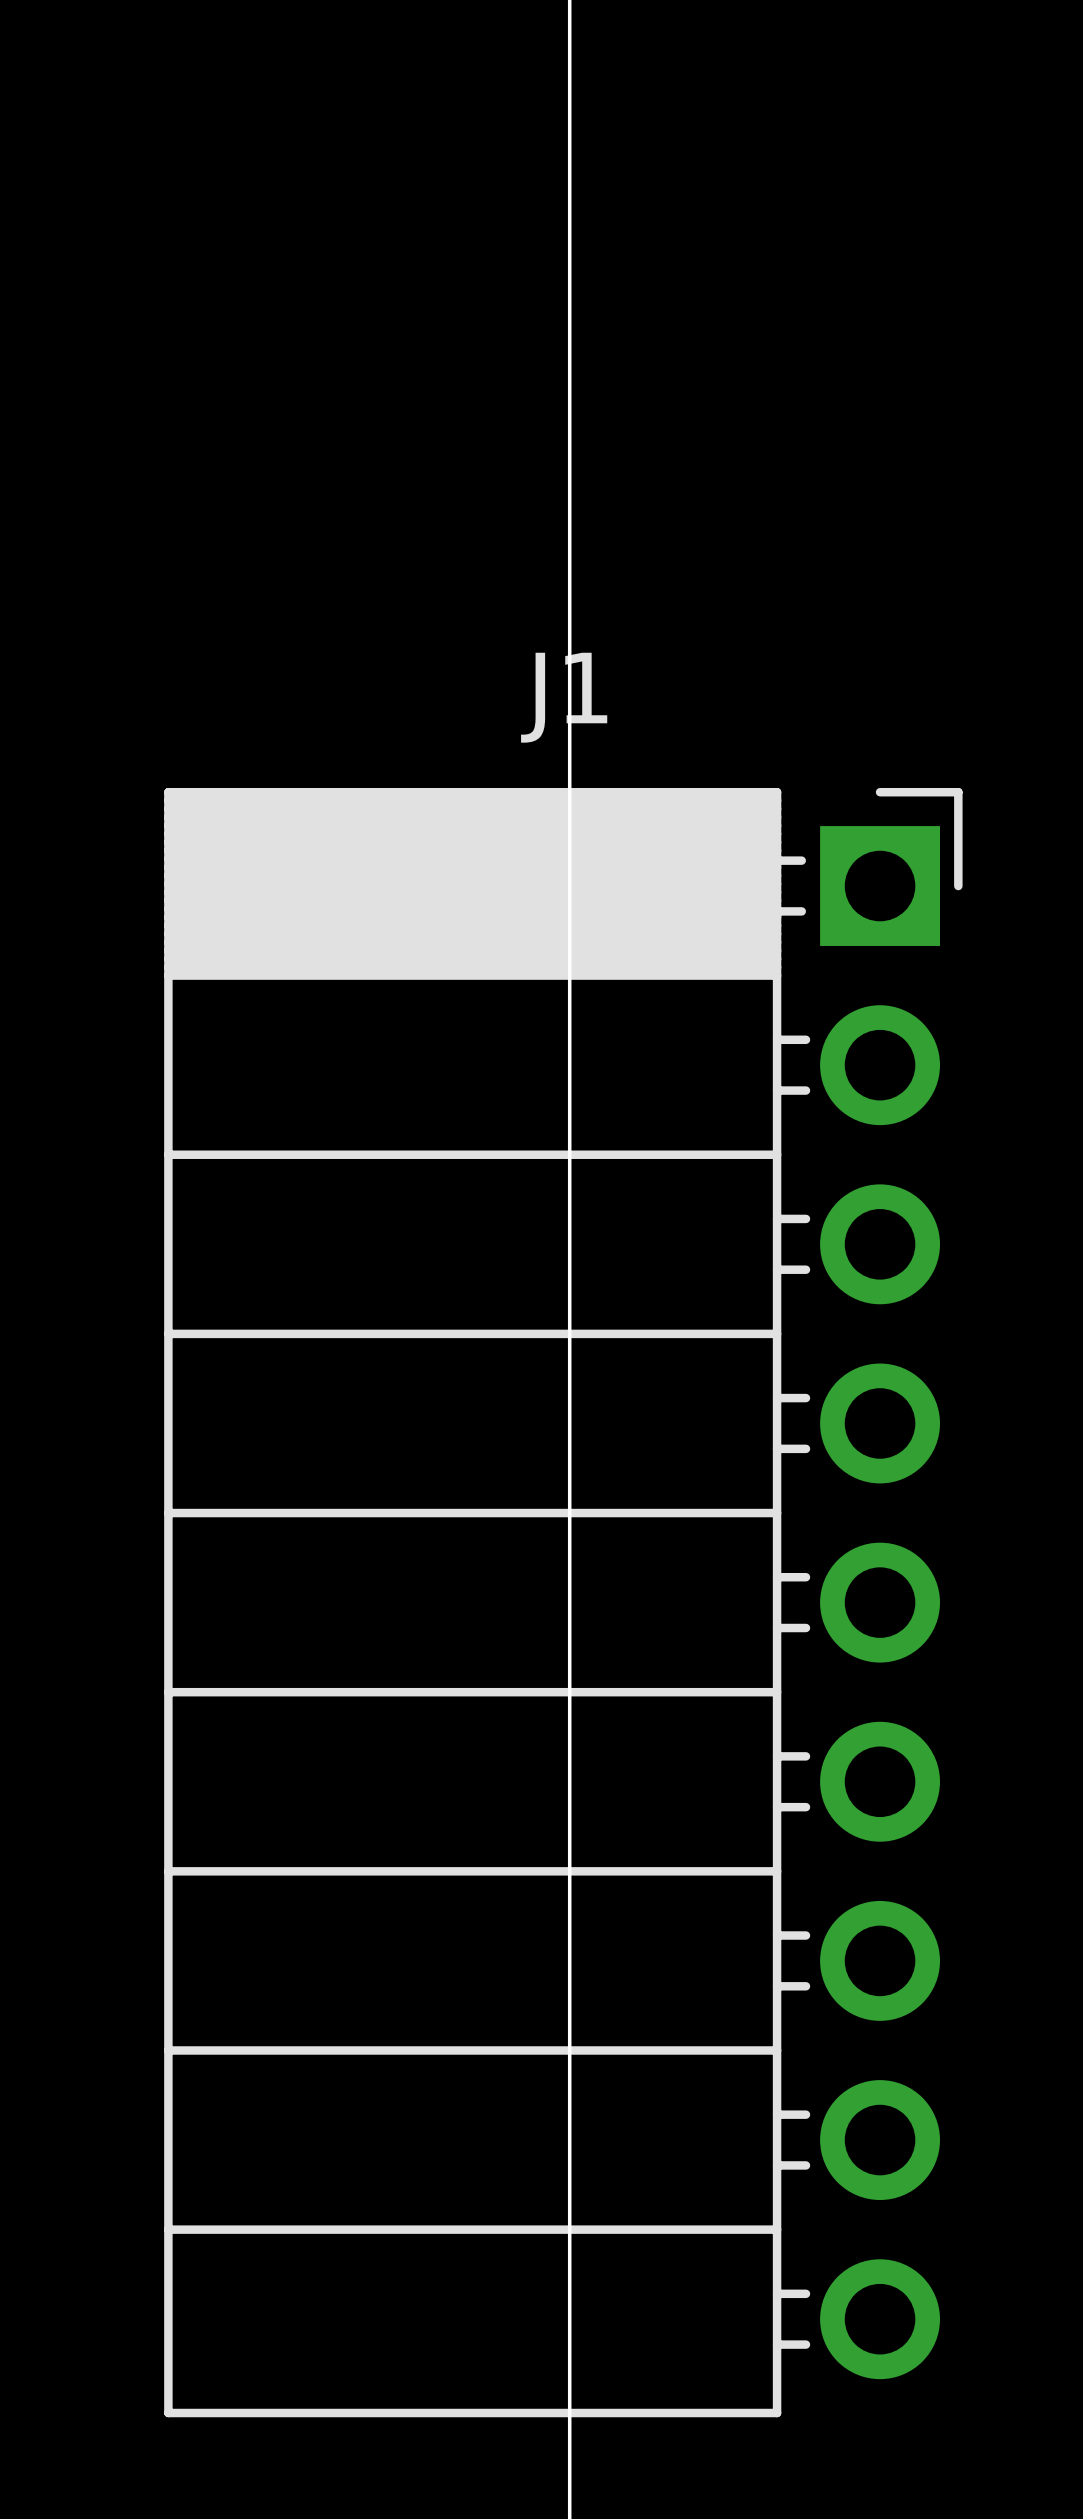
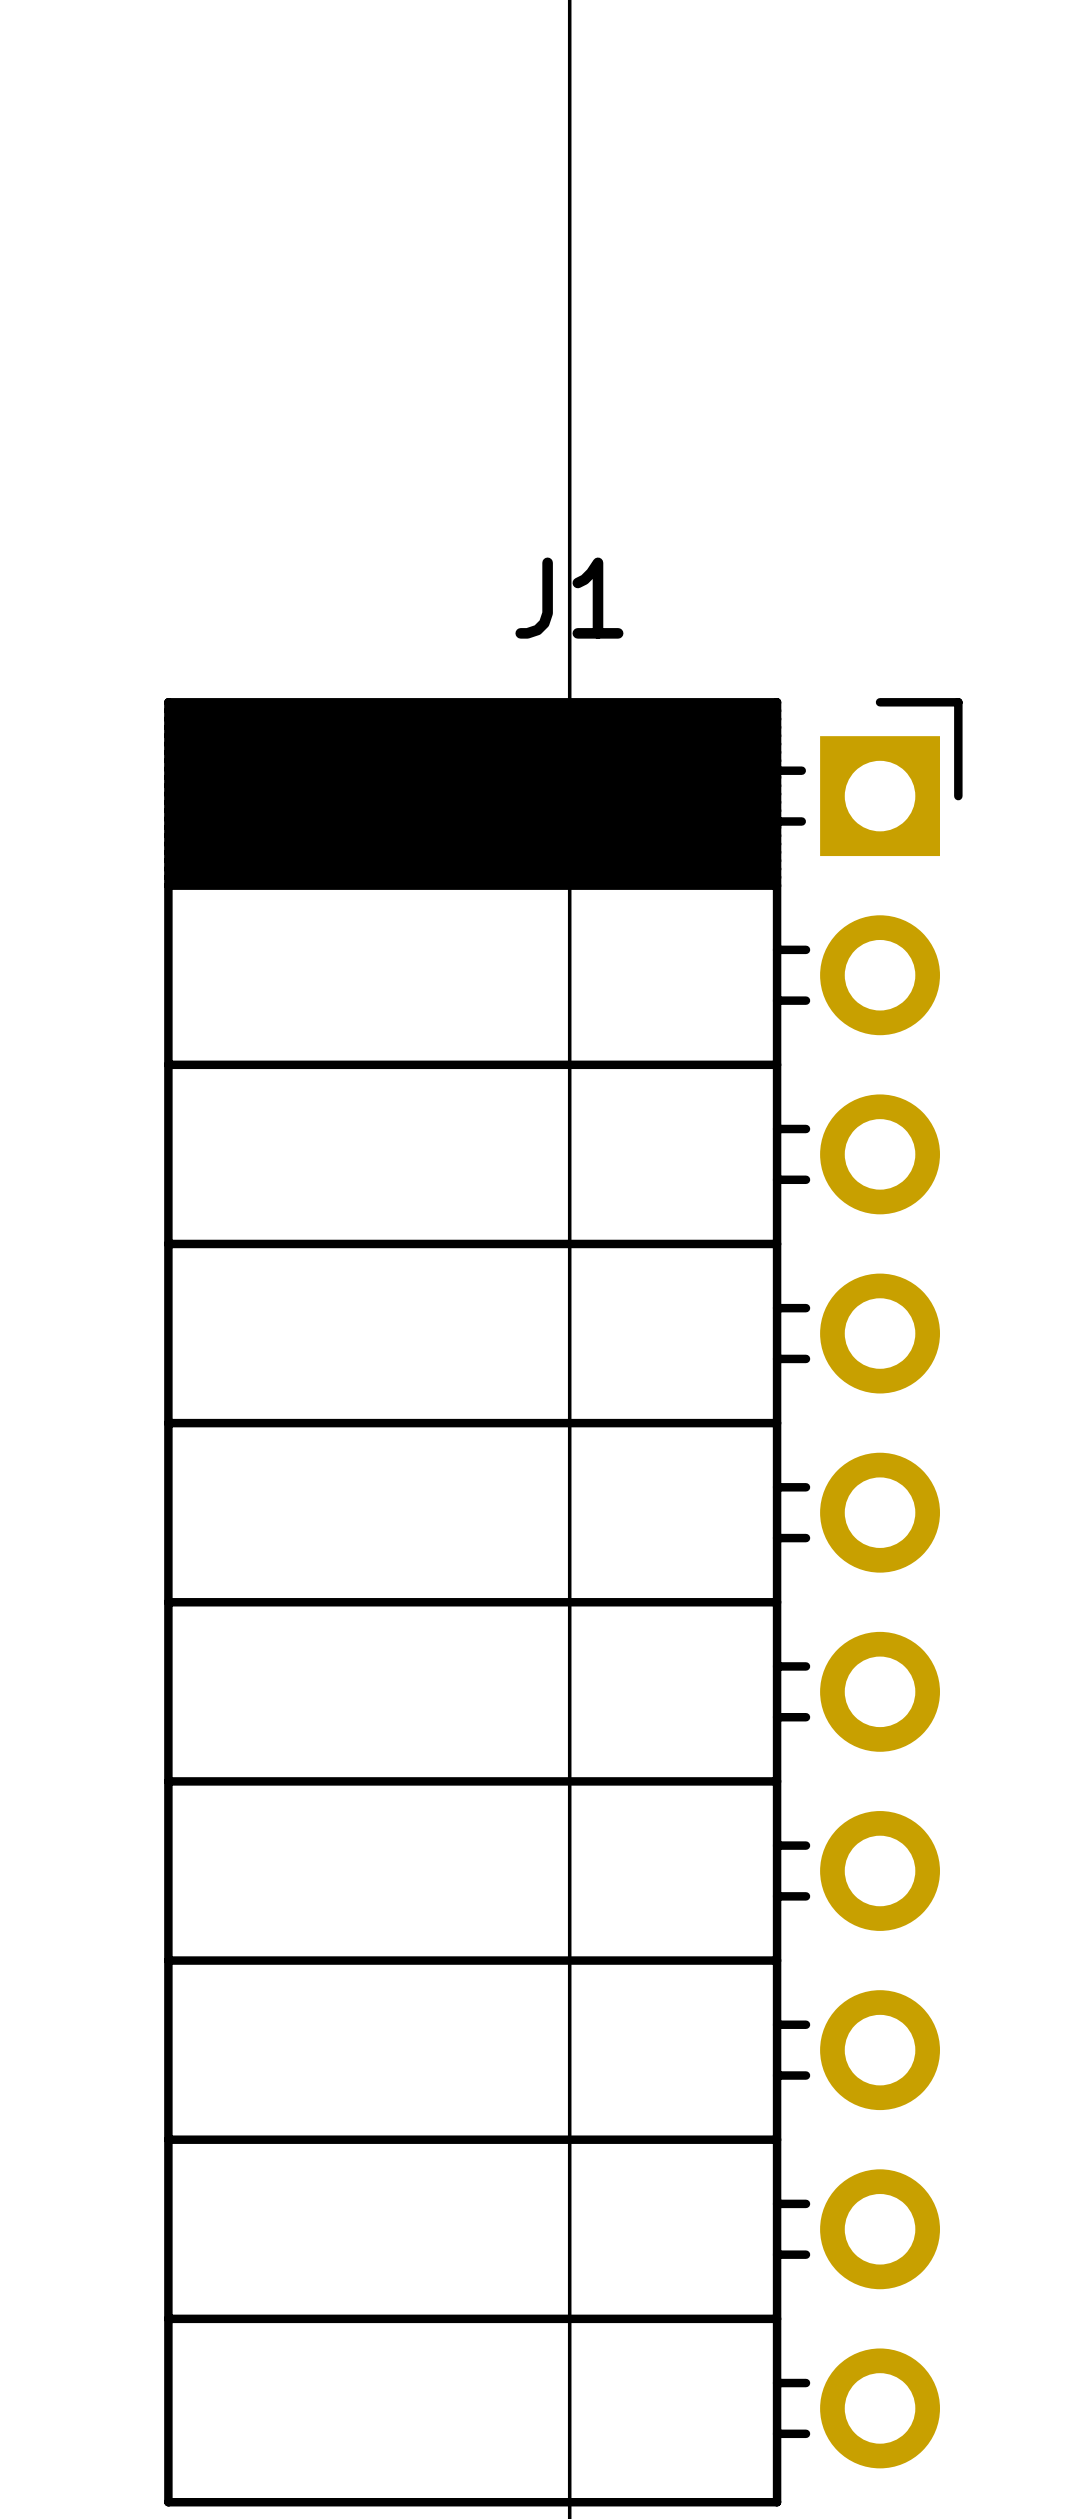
J1 footprint: [164, 787, 963, 2418] -> [164, 698, 963, 2507]

